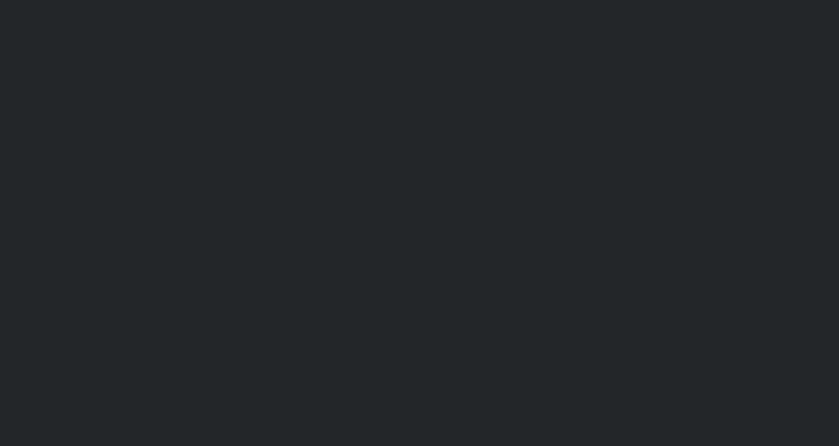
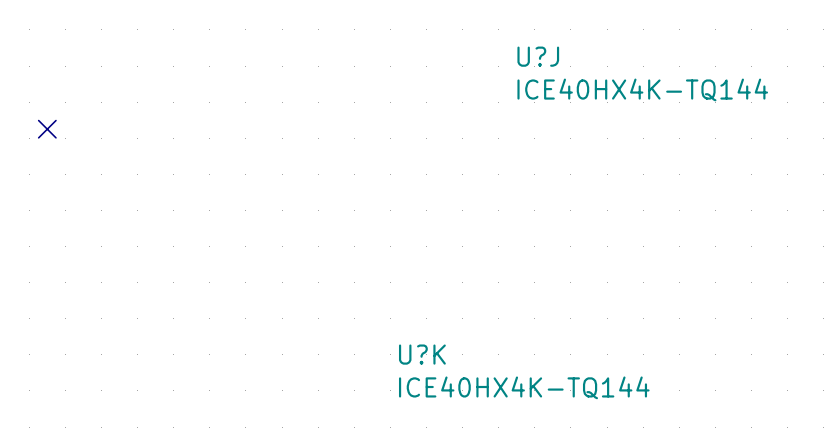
U?J: none -> ICE40HX4K-TQ144 (642, 73)
no-connect mark: none -> (47, 129)
U?K: none -> ICE40HX4K-TQ144 (524, 371)

